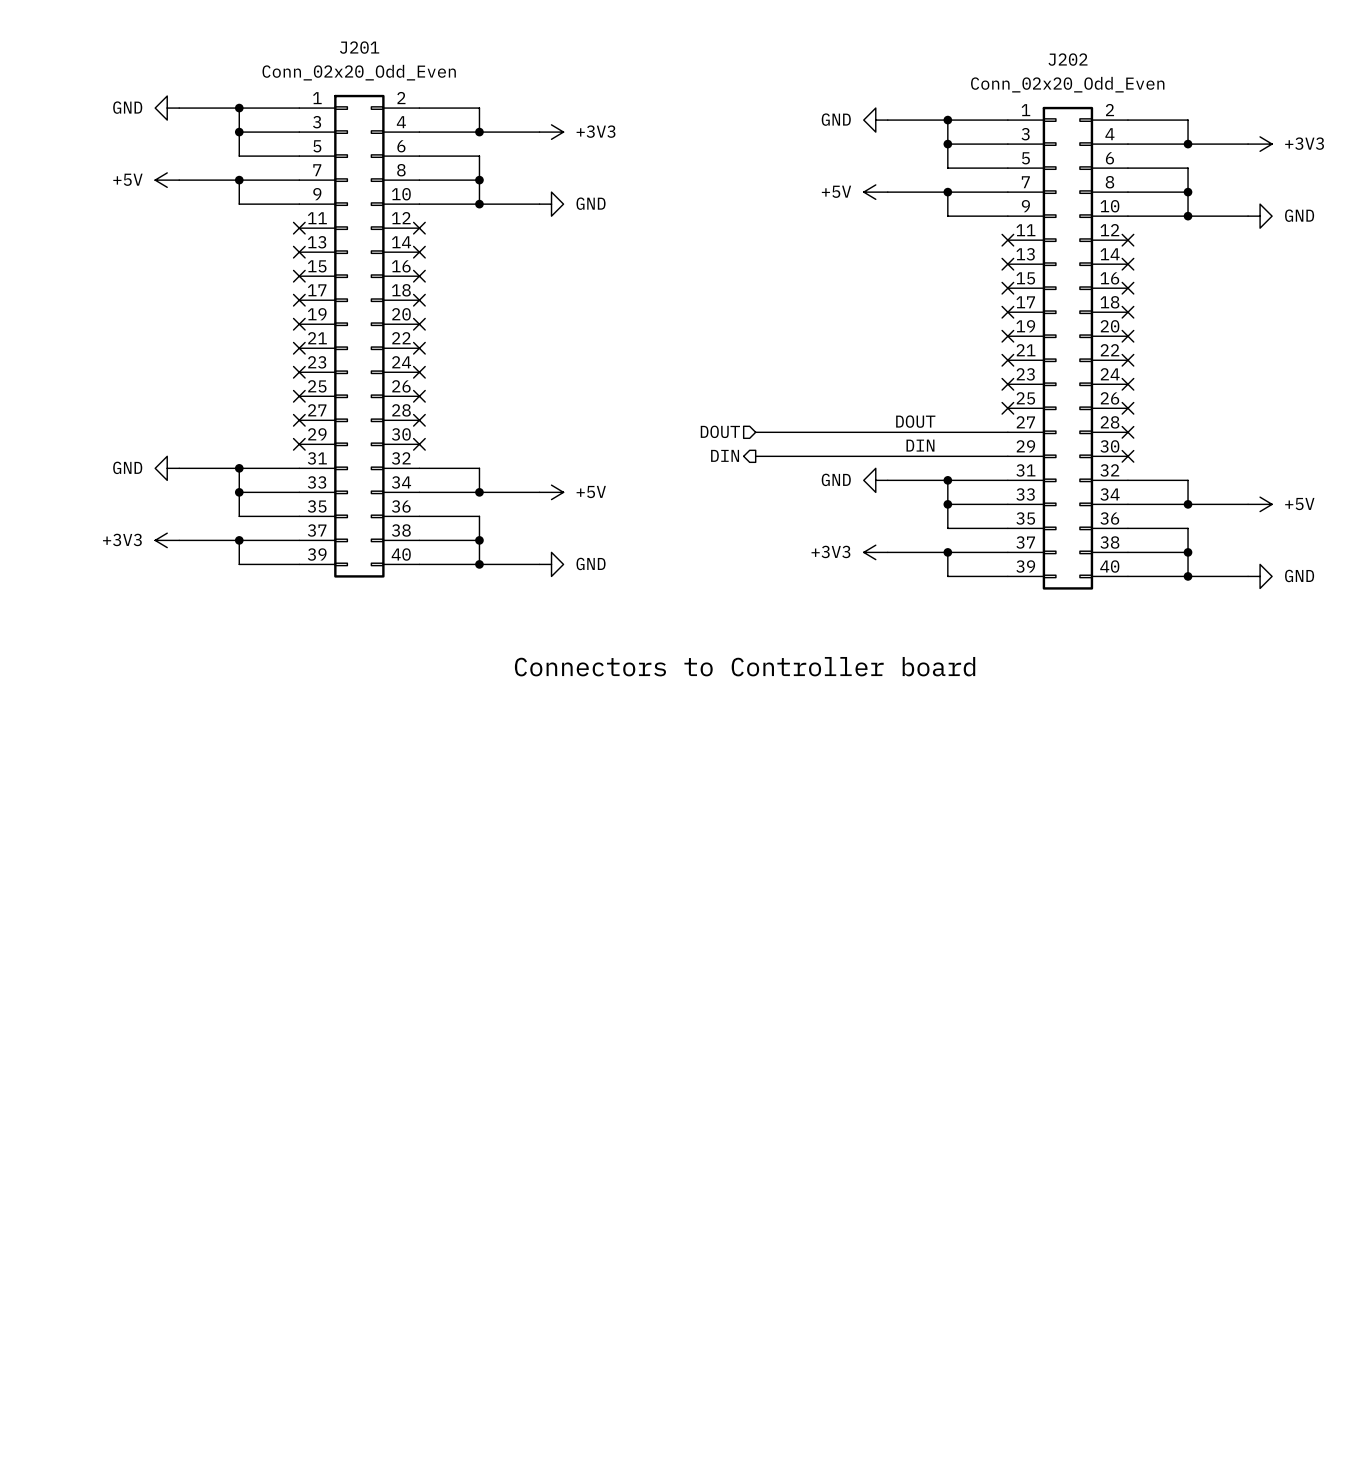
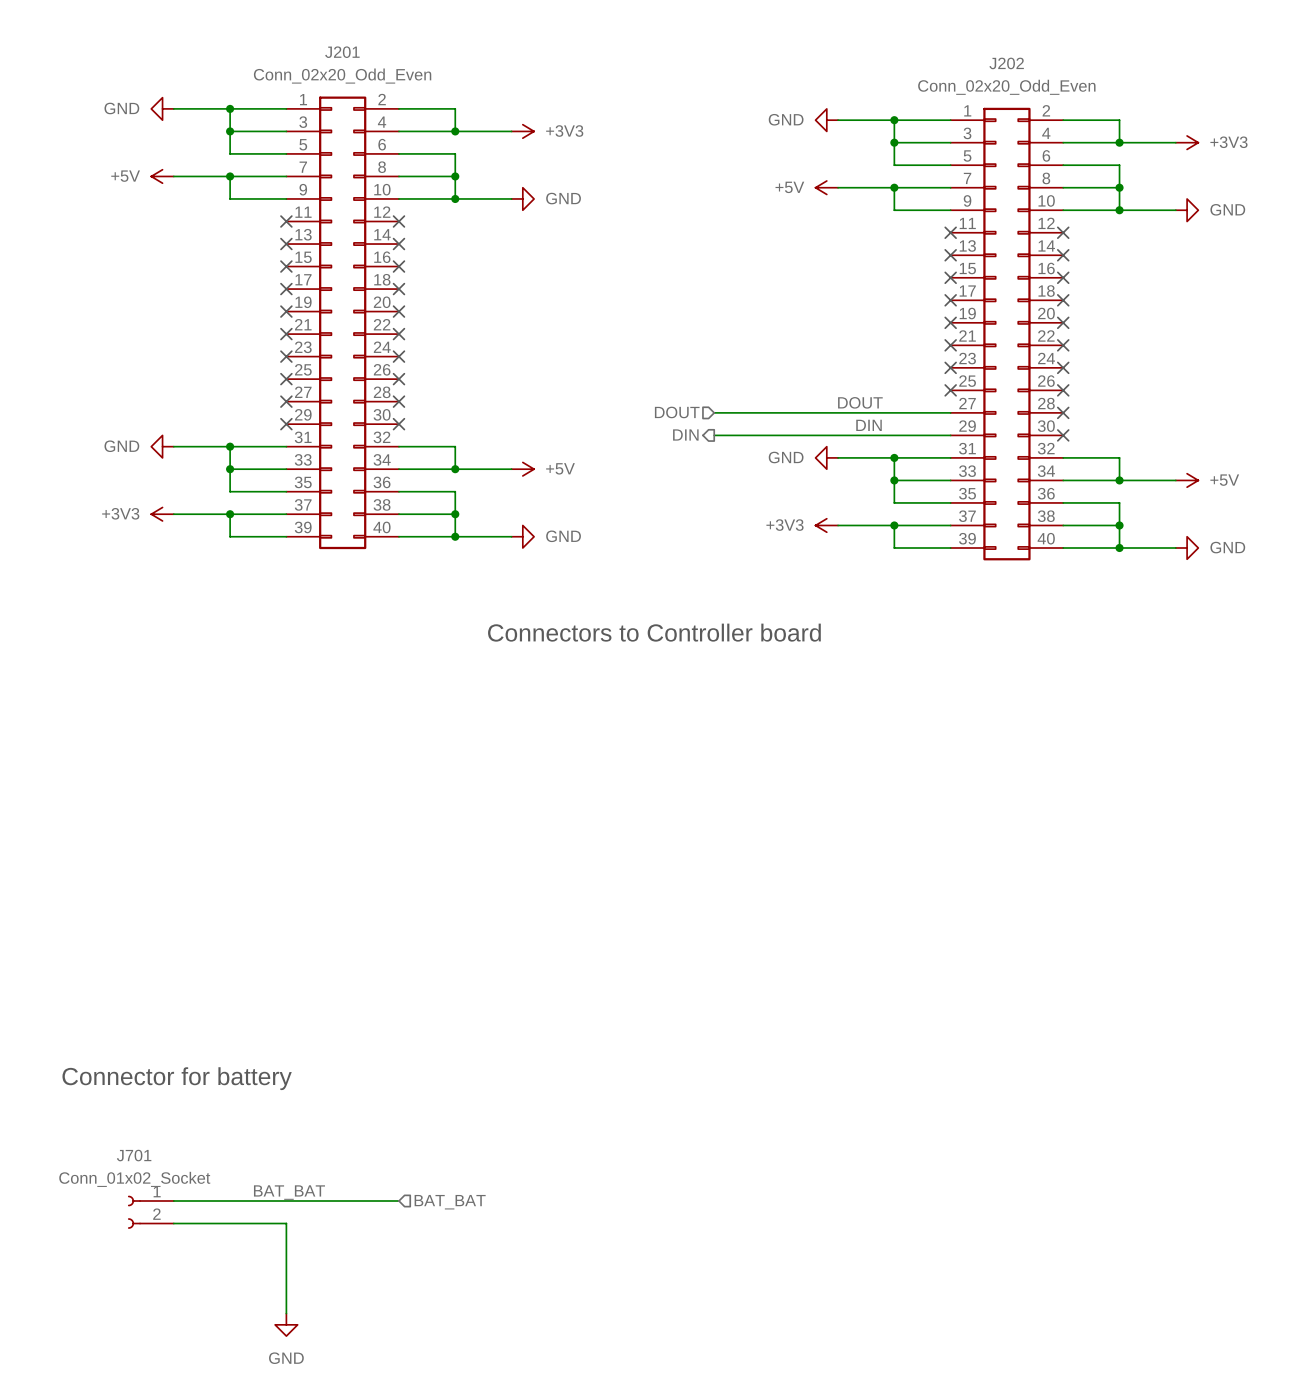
text: none -> Connector for battery (177, 1078)
label: none -> BAT_BAT (289, 1192)
wire: none -> (173, 1201) (398, 1201)
hierarchical label: none -> BAT_BAT (450, 1202)
J701: none -> Conn_01x02_Socket (150, 1212)
wire: none -> (173, 1223) (286, 1223) (286, 1313)
power symbol: none -> GND (286, 1324)

